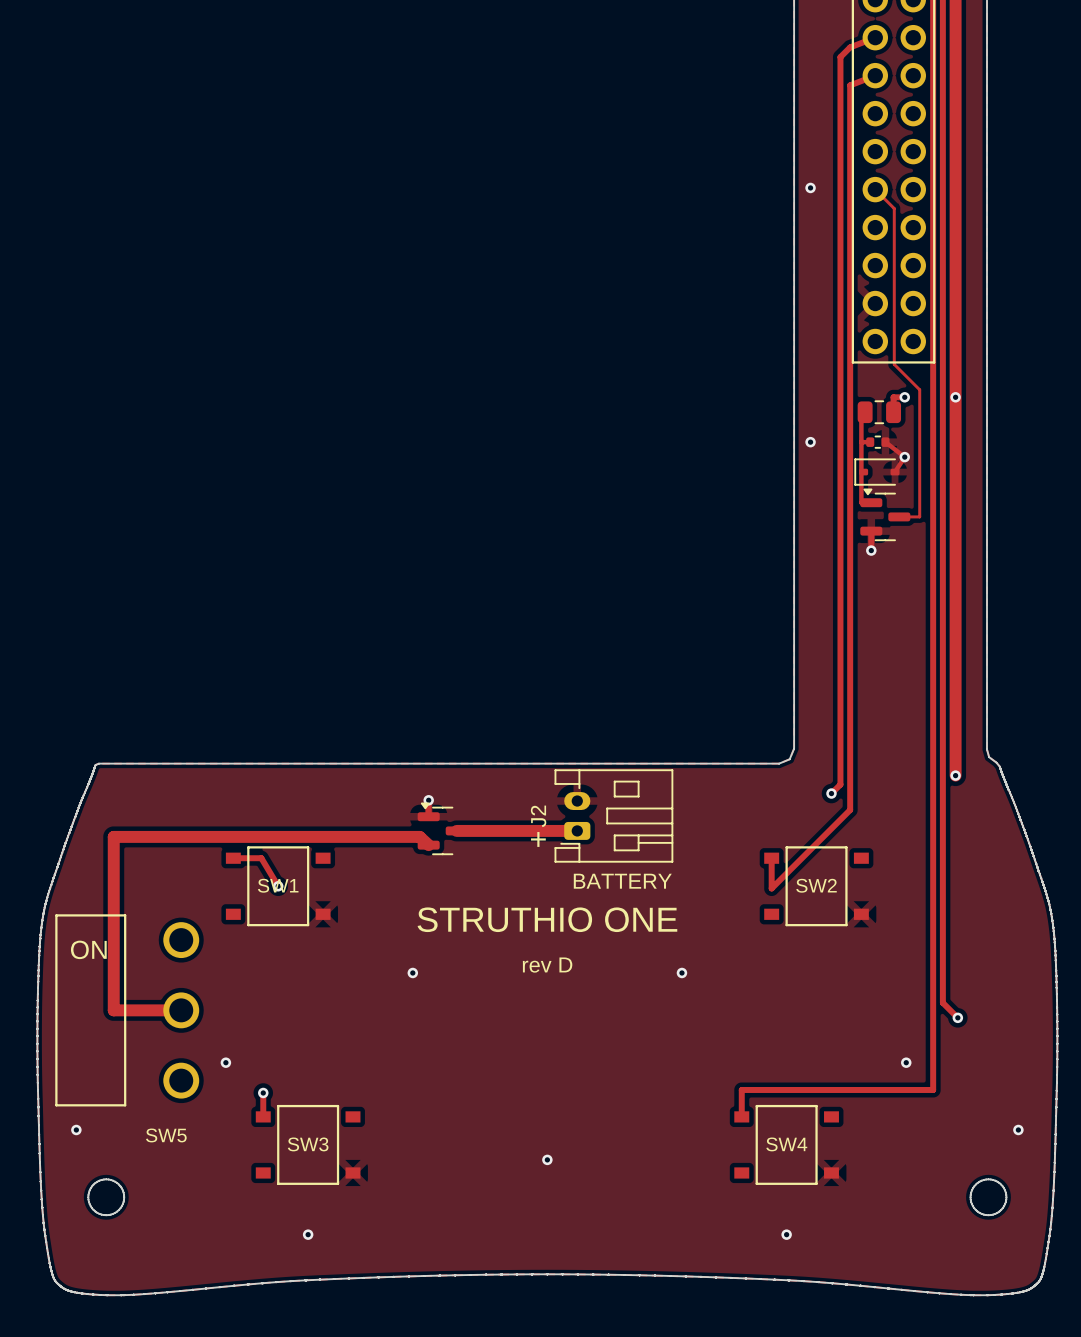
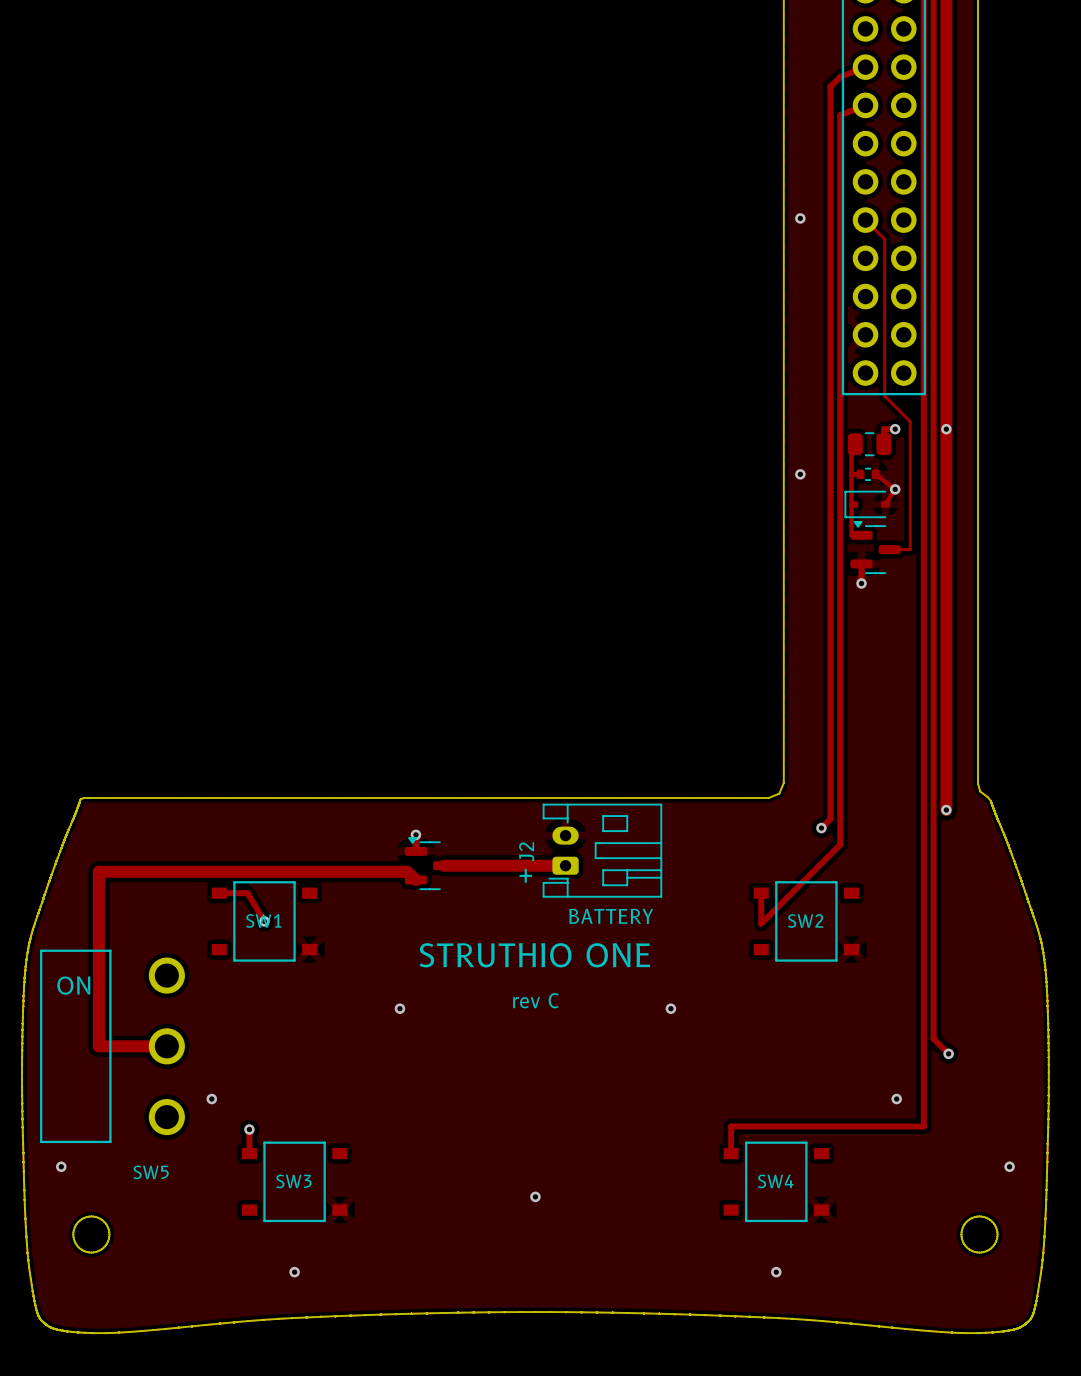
text: rev D (547, 965) -> rev C (536, 1000)

